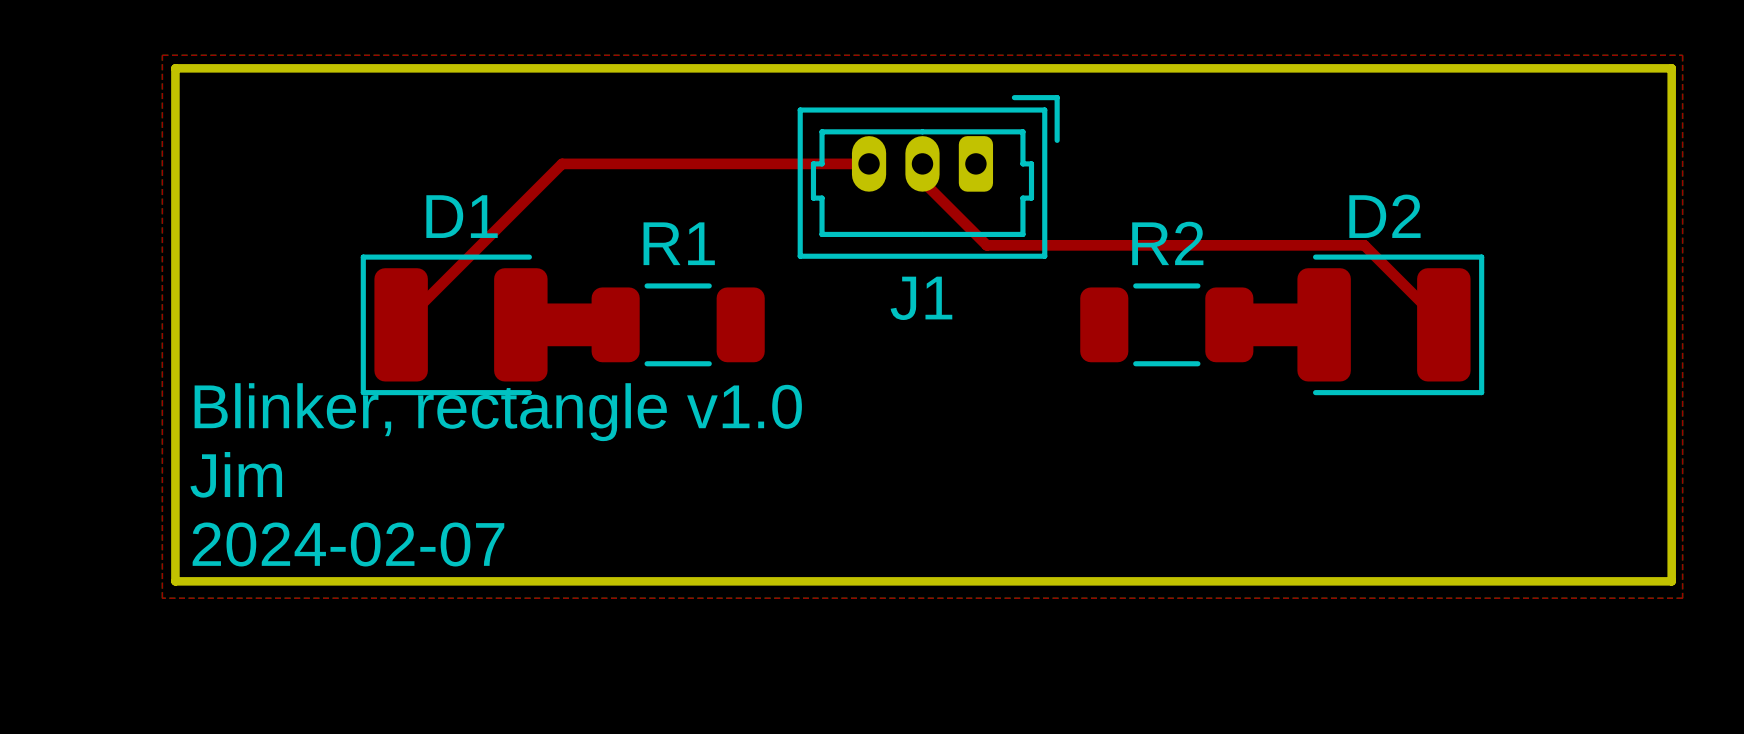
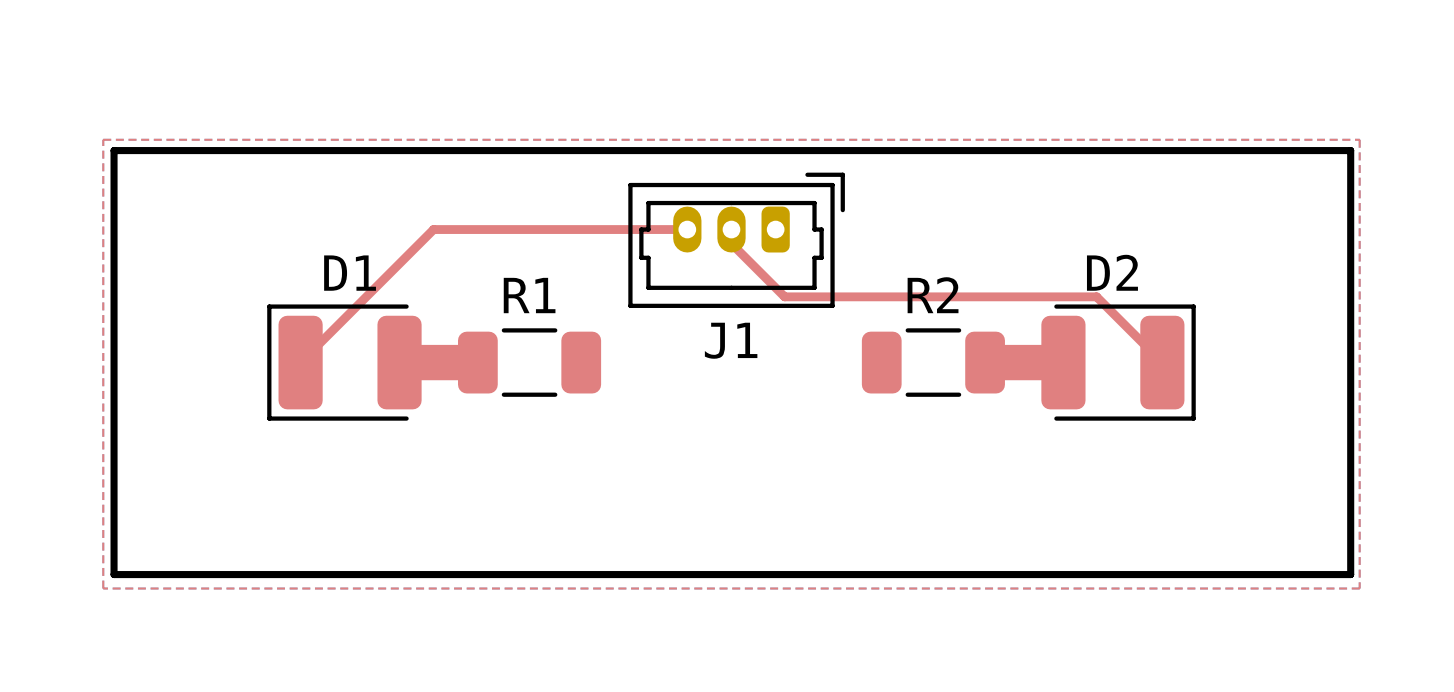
text: Blinker, rectangle v1.0 (498, 412) -> none
text: Jim (236, 474) -> none
text: 2024-02-07 (348, 544) -> none

